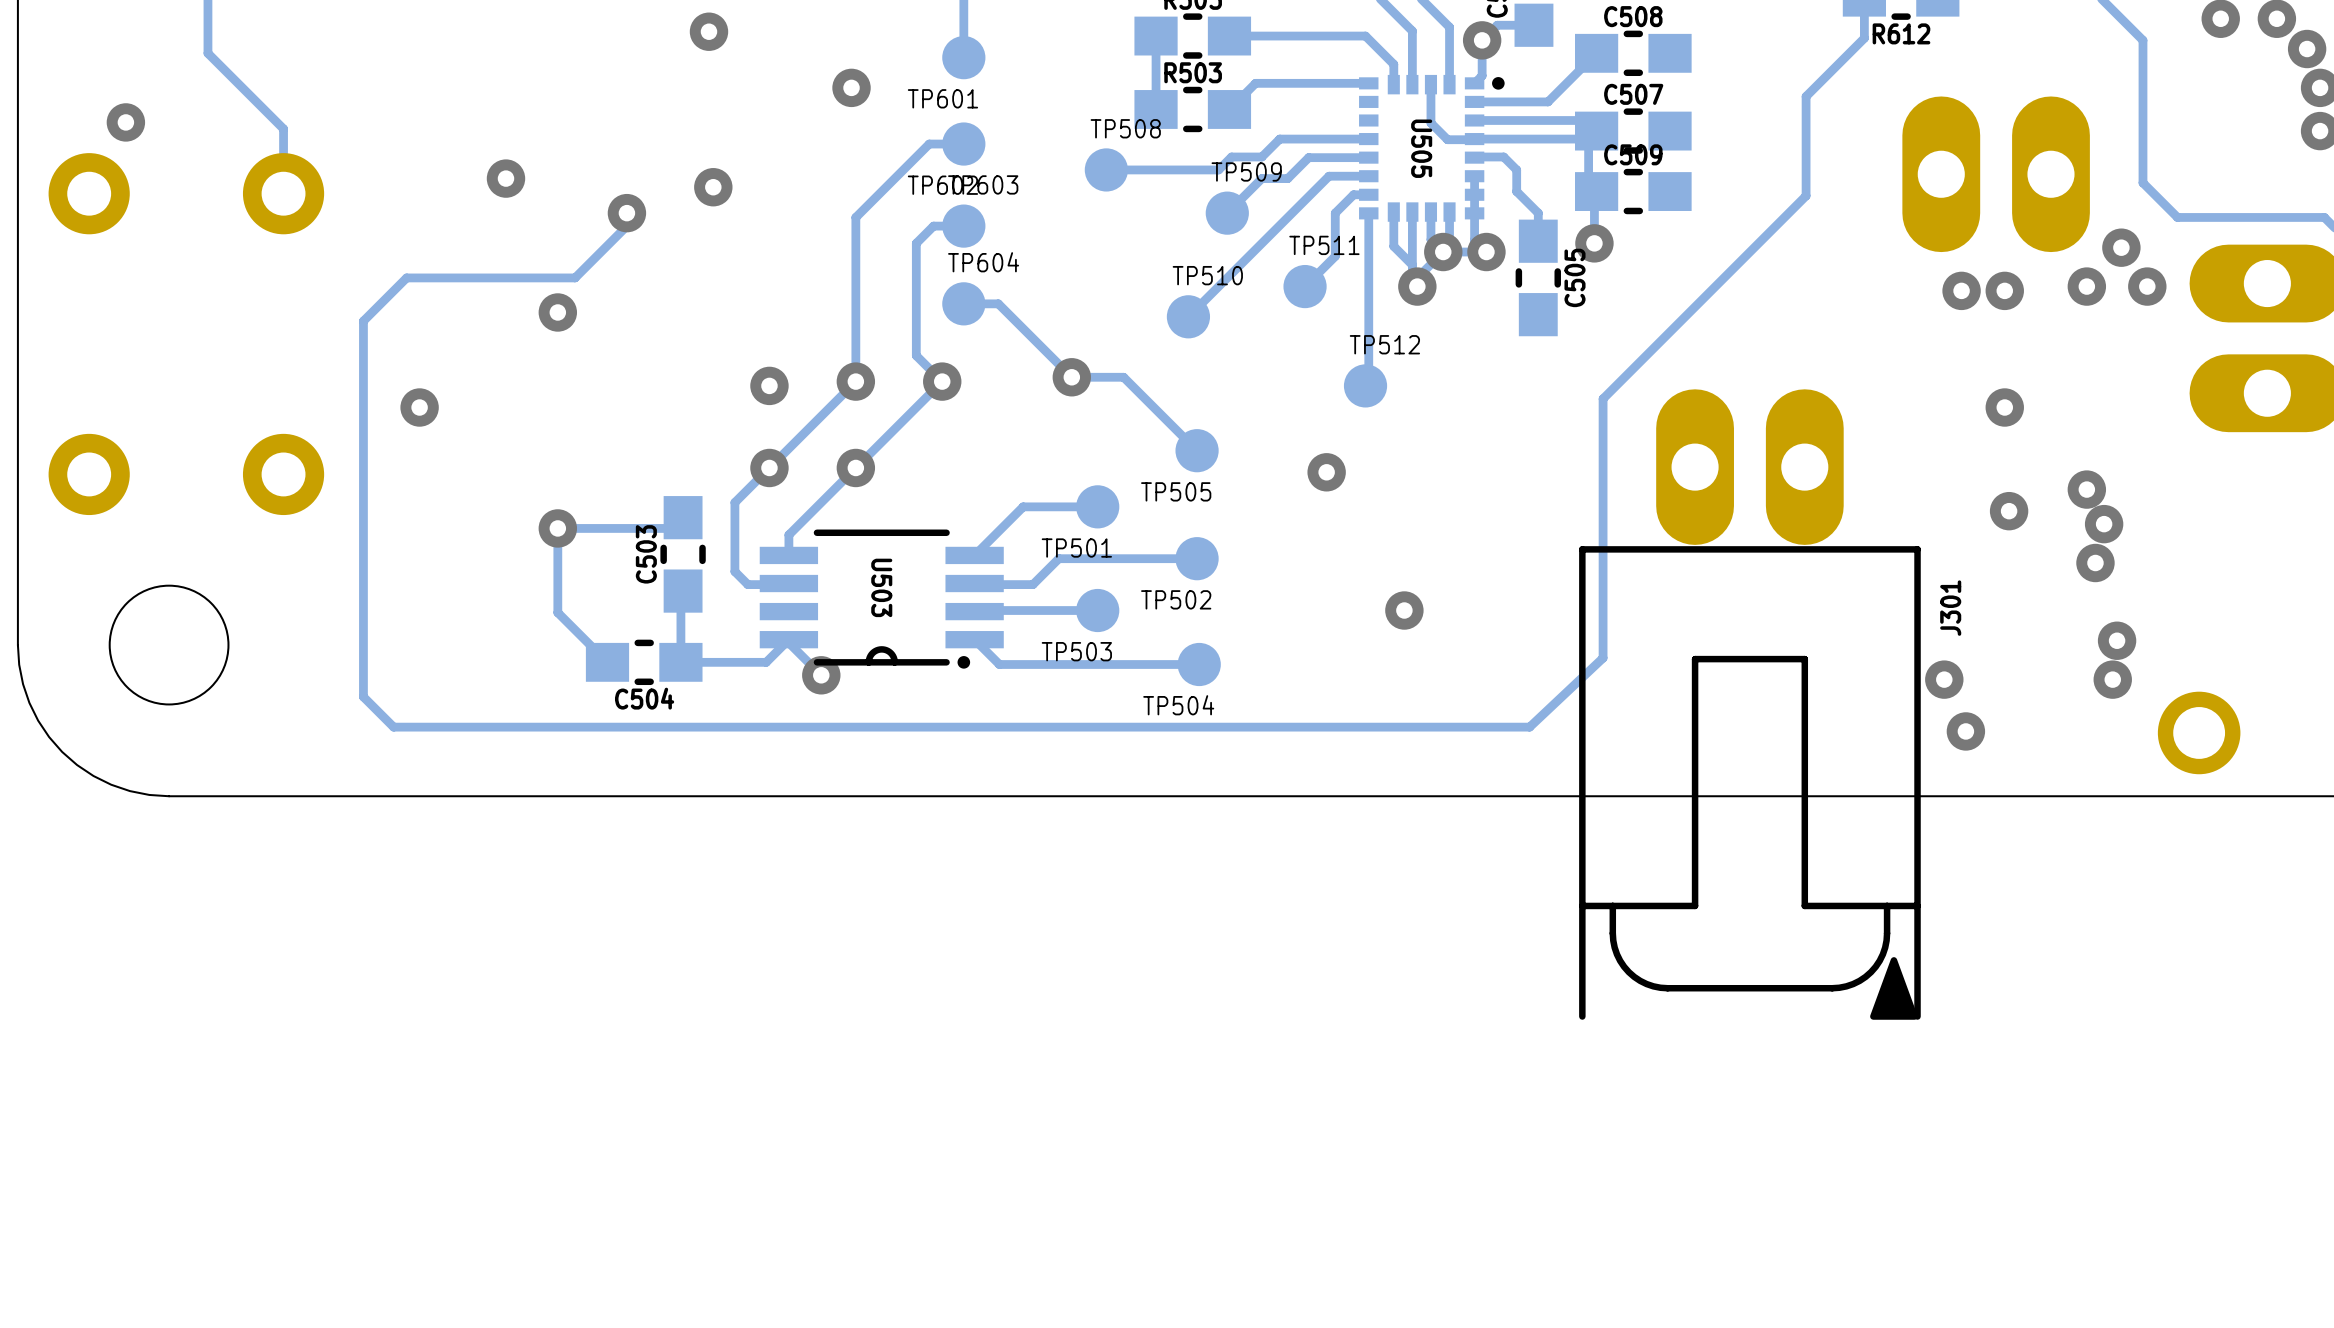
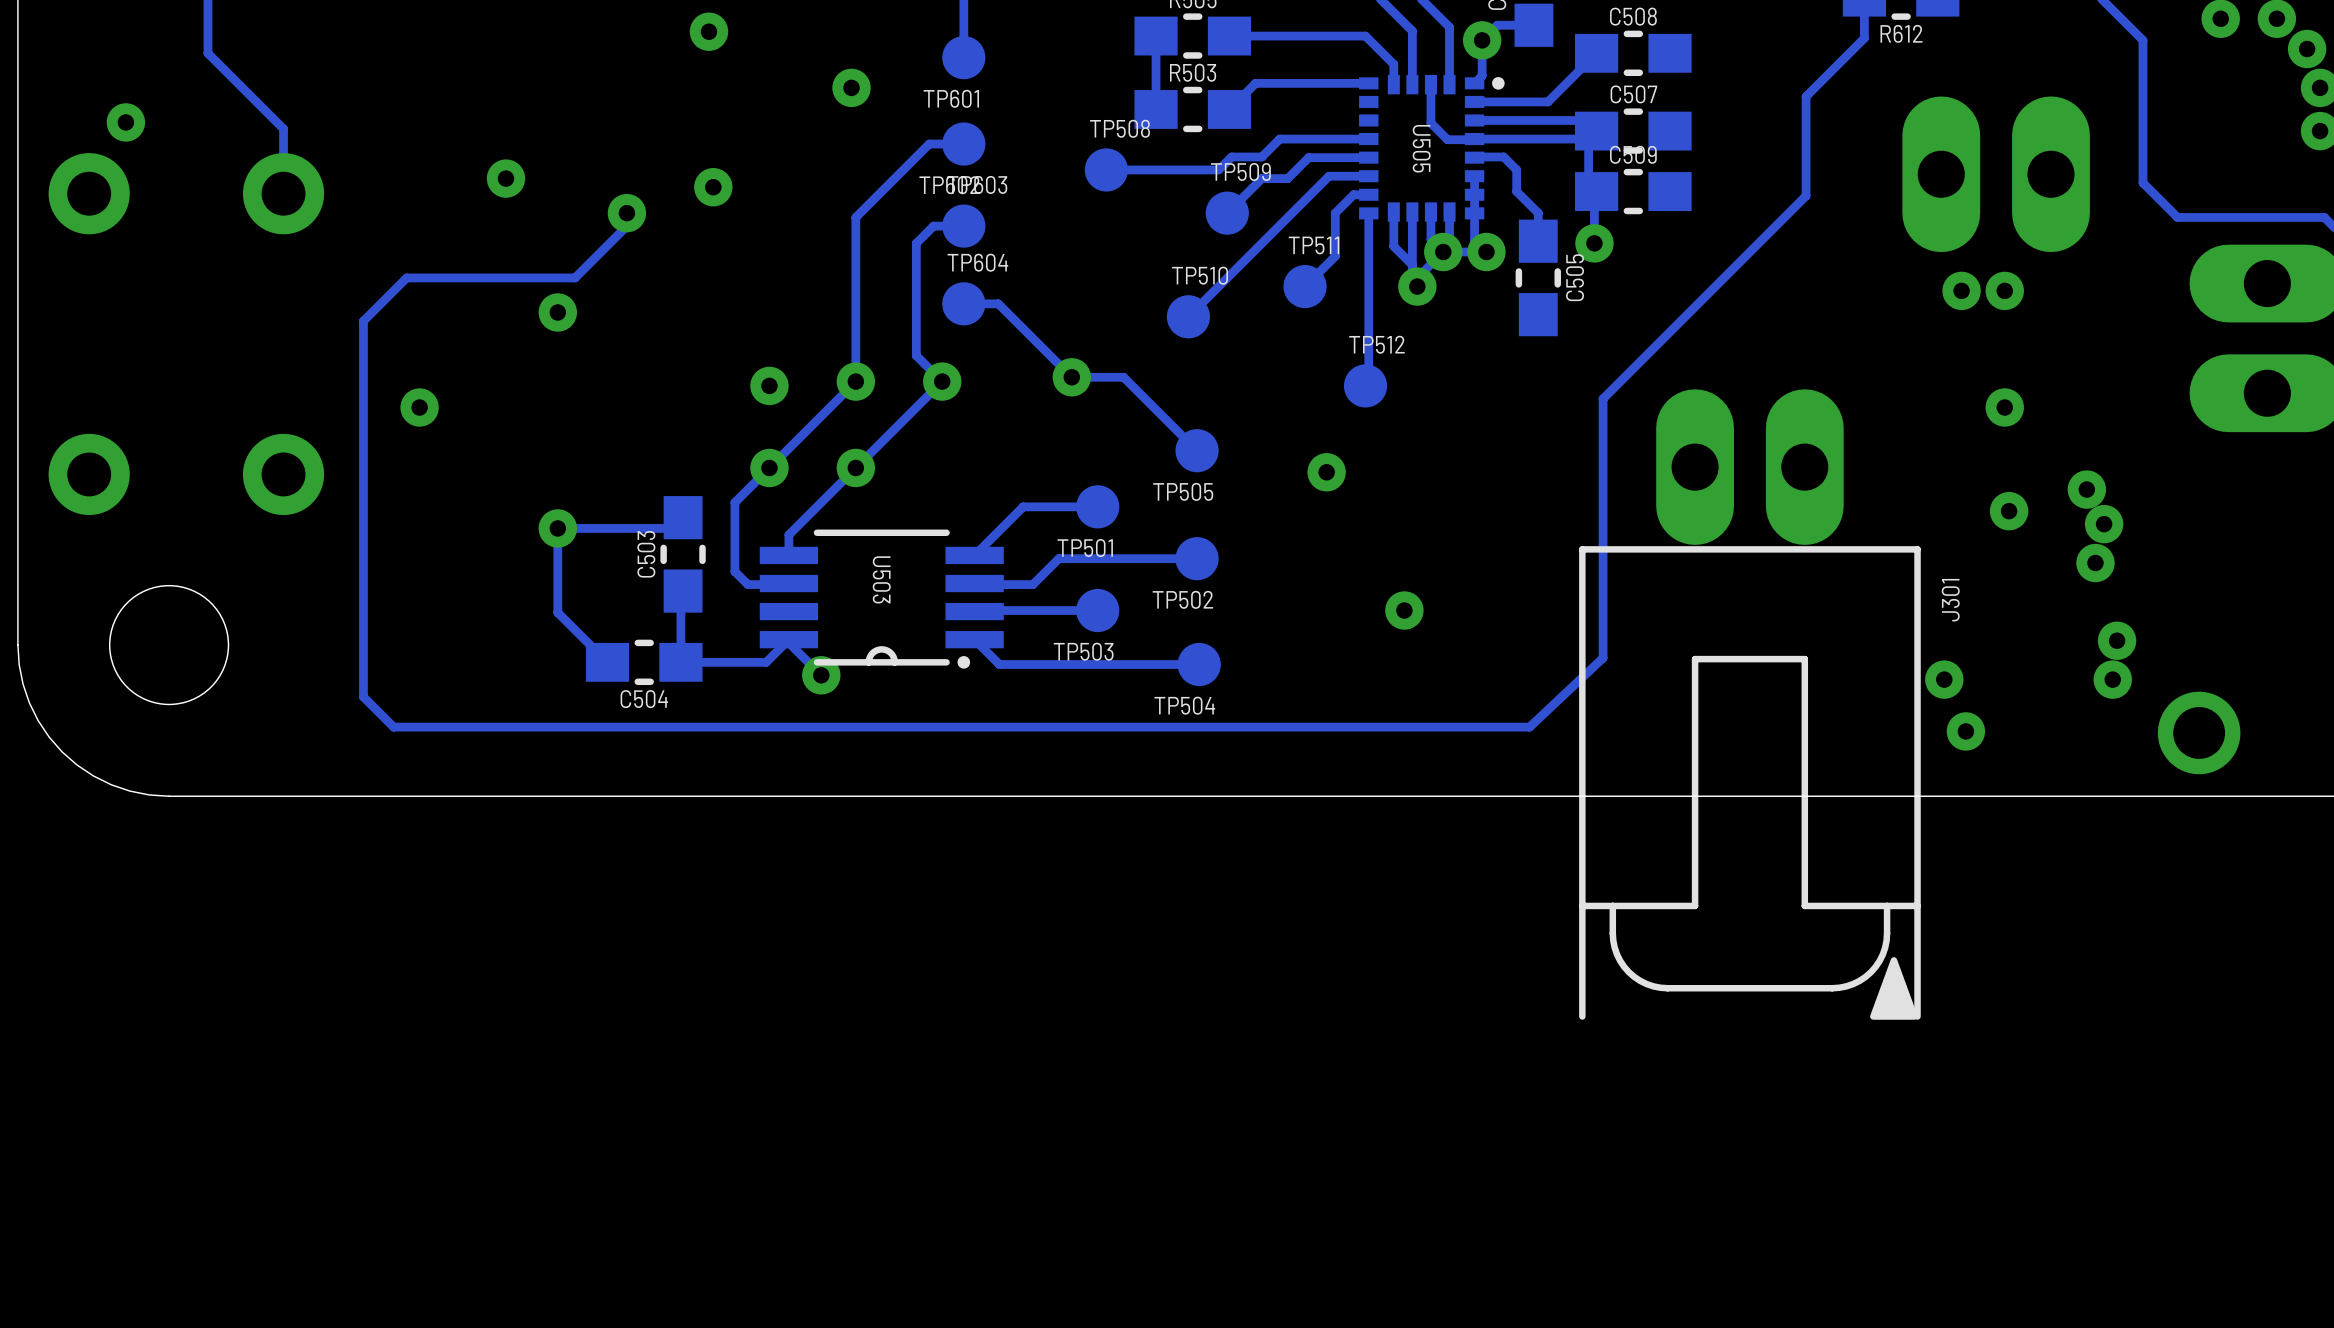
via: (2121, 247) -> none
via: (2086, 286) -> none
via: (2147, 286) -> none

